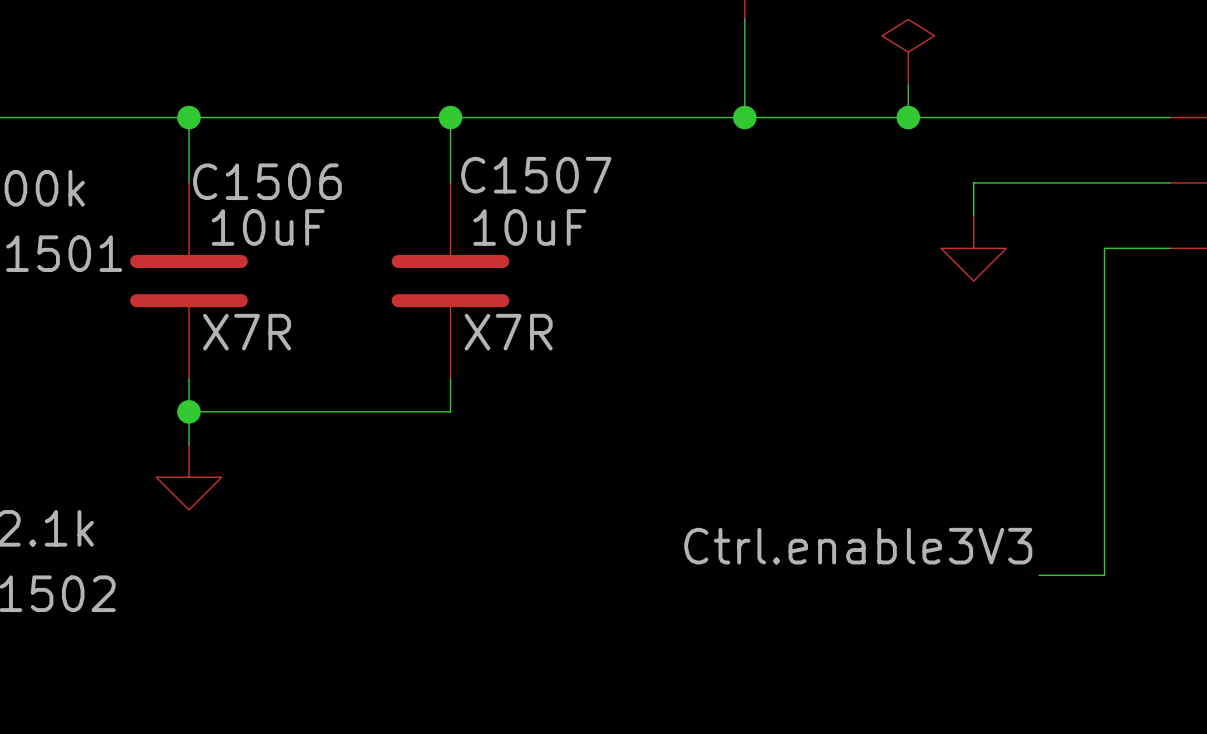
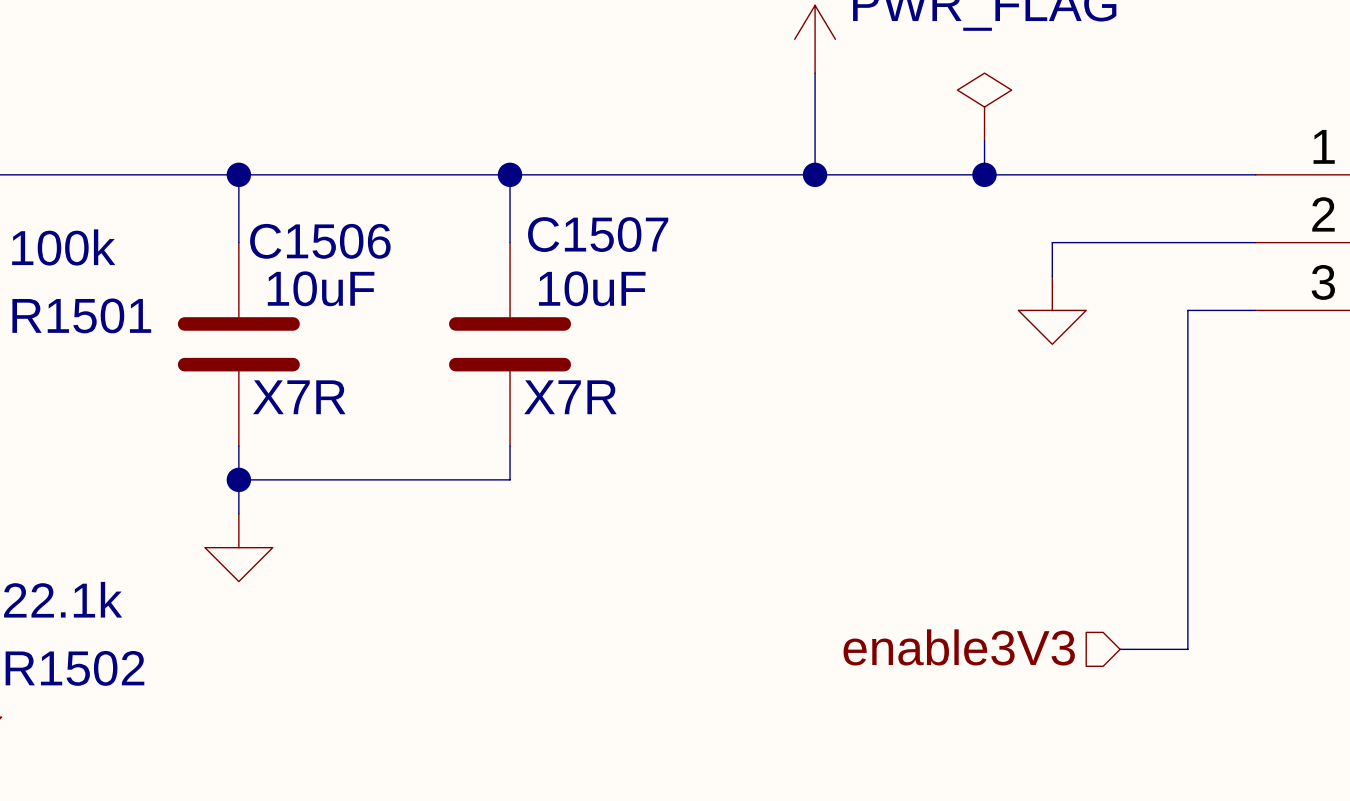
label: Ctrl.enable3V3 (858, 546) -> none
hierarchical label: none -> enable3V3 (959, 647)

